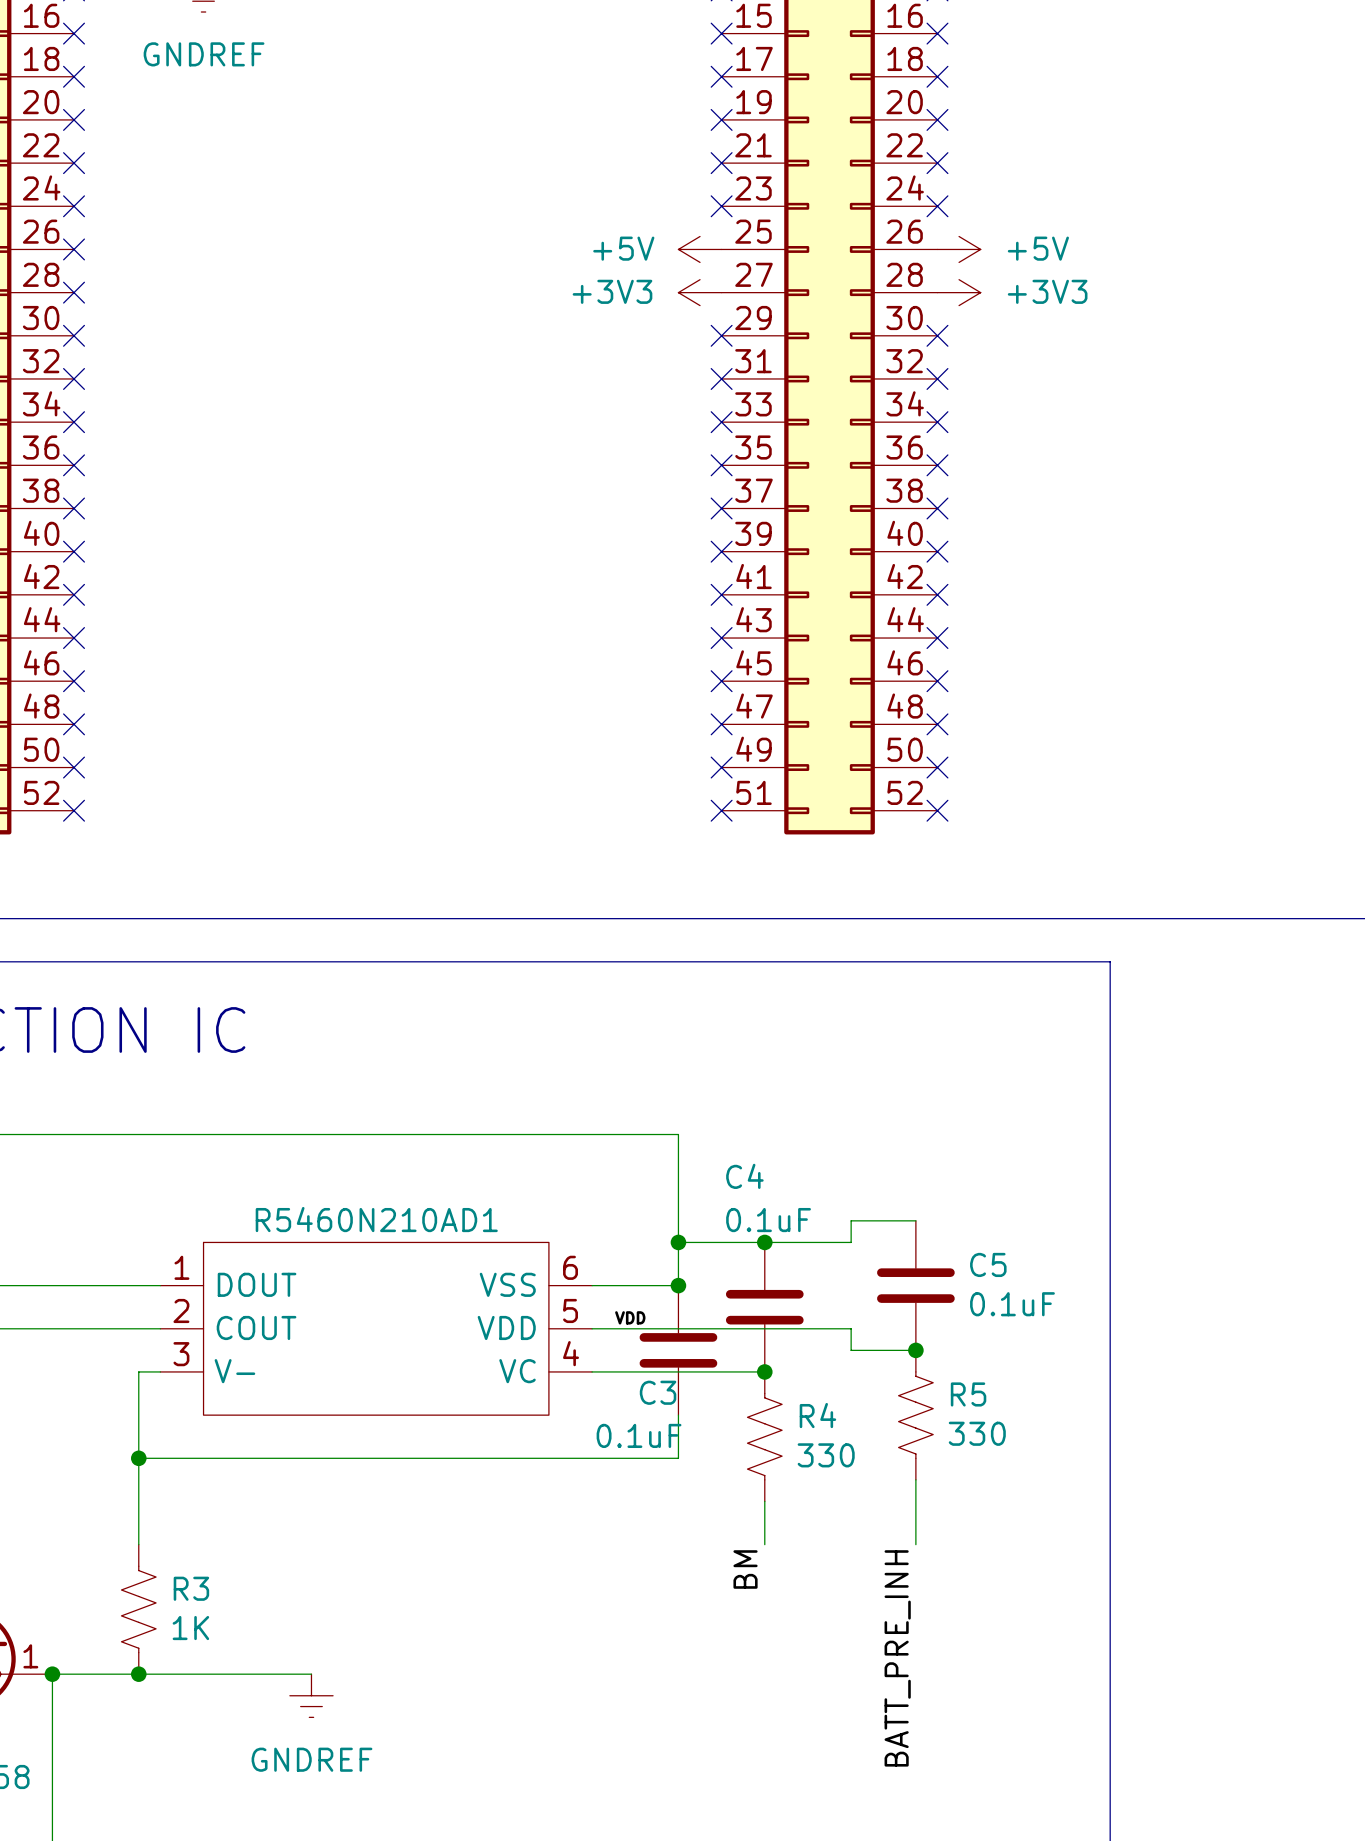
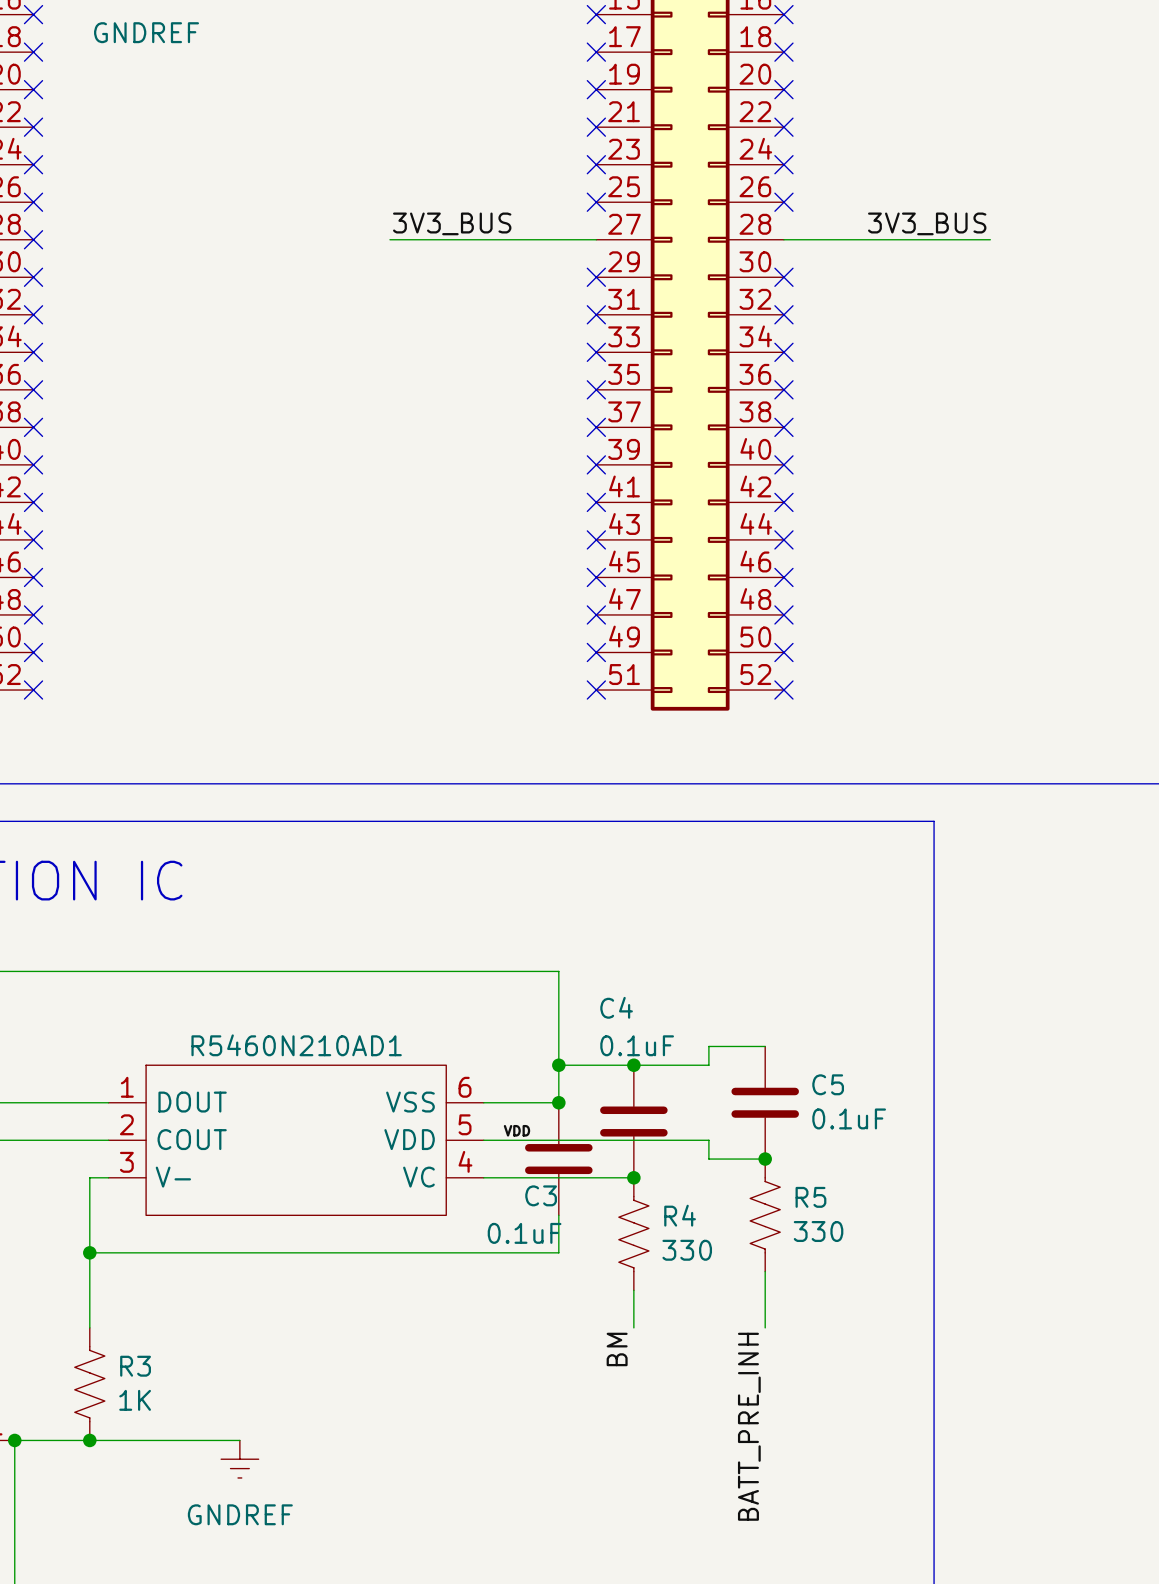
power symbol: +5V (700, 249) -> none
no-connect mark: none -> (596, 202)
no-connect mark: none -> (783, 202)
power symbol: +5V (959, 249) -> none
label: none -> 3V3_BUS (452, 223)
label: none -> 3V3_BUS (927, 223)
wire: none -> (389, 239) (596, 239)
power symbol: +3V3 (700, 292) -> none
wire: none -> (783, 239) (990, 239)
power symbol: +3V3 (959, 292) -> none

